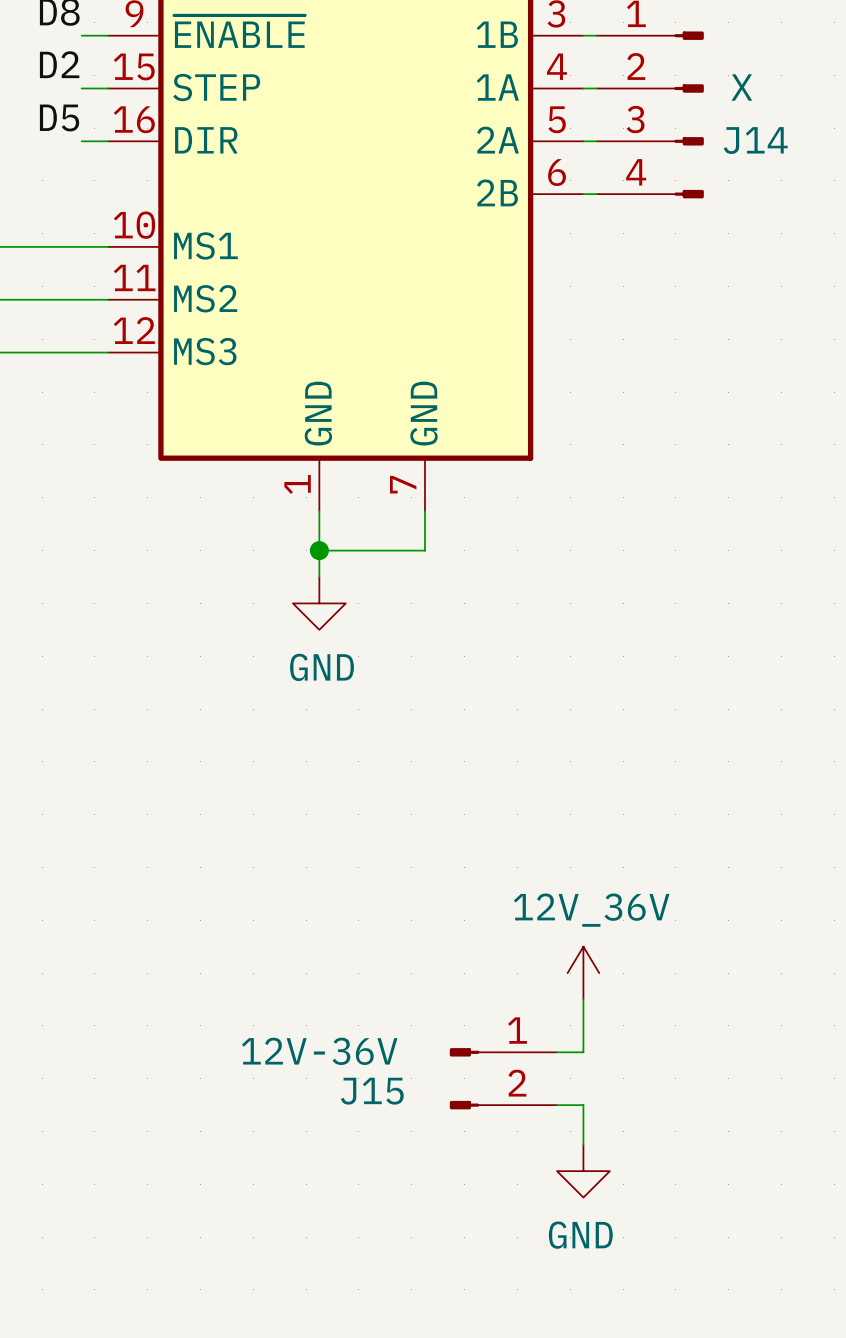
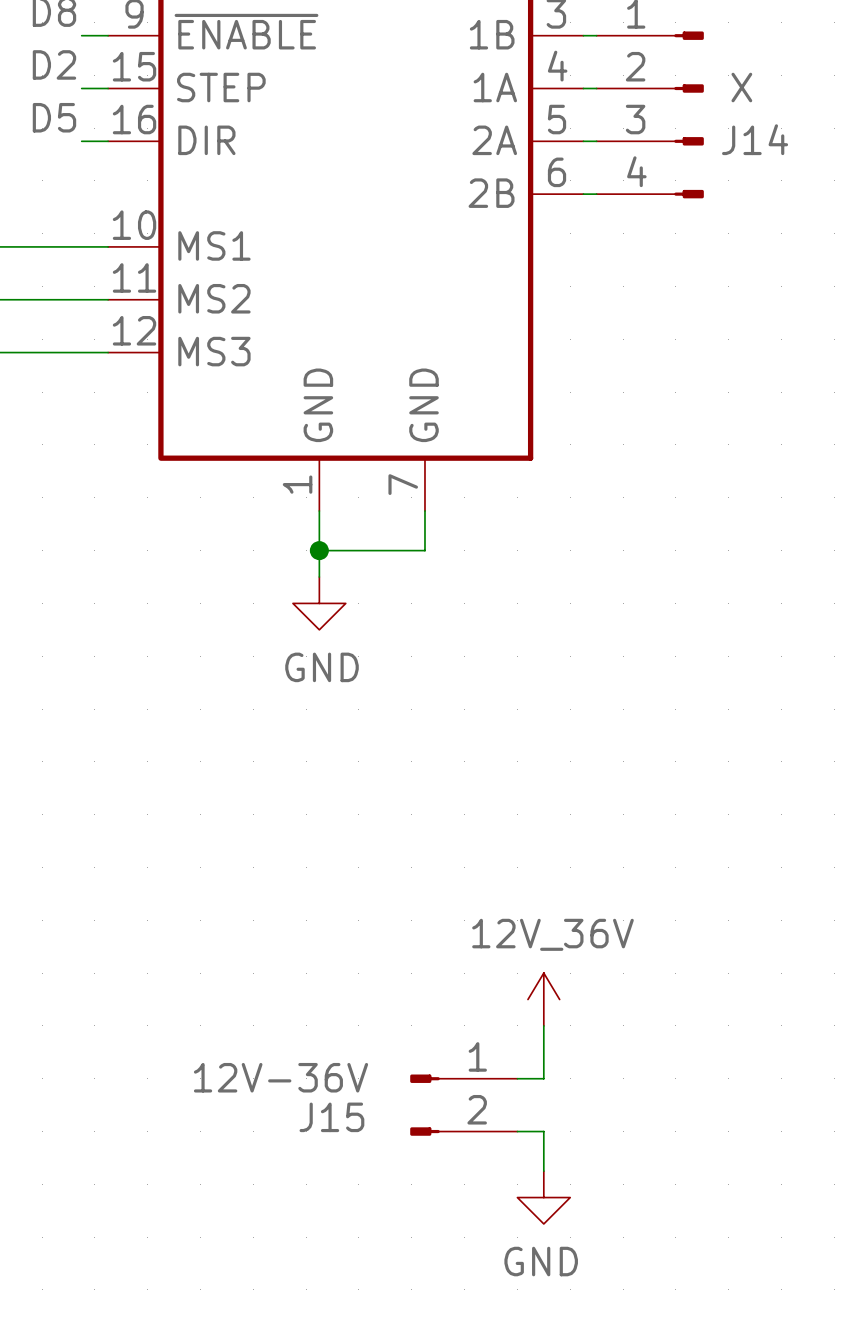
power symbol position: 12V_36V (583, 973) -> 12V_36V (543, 999)
wire: (583, 999) (583, 1052) (557, 1052) -> (543, 1025) (543, 1078) (517, 1078)
J15 position: (503, 1078) -> (463, 1105)
wire: (557, 1105) (583, 1105) (583, 1144) -> (517, 1131) (543, 1131) (543, 1171)
power symbol position: GND (583, 1171) -> GND (543, 1197)

